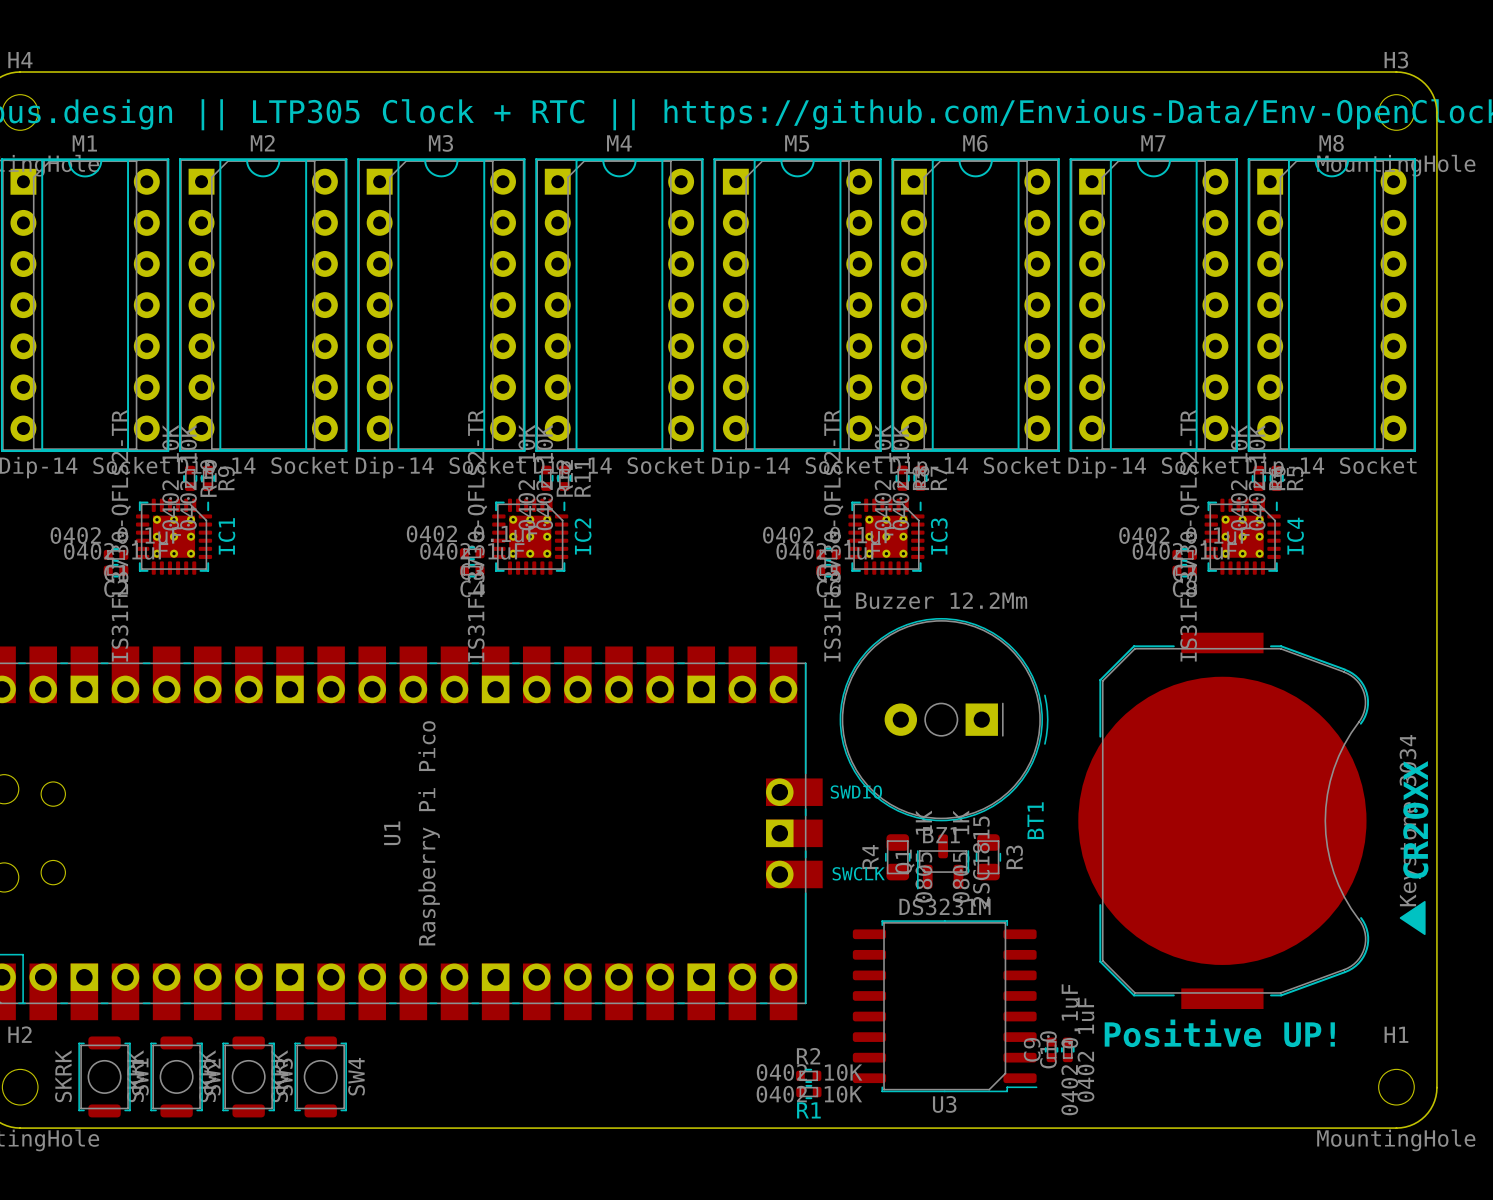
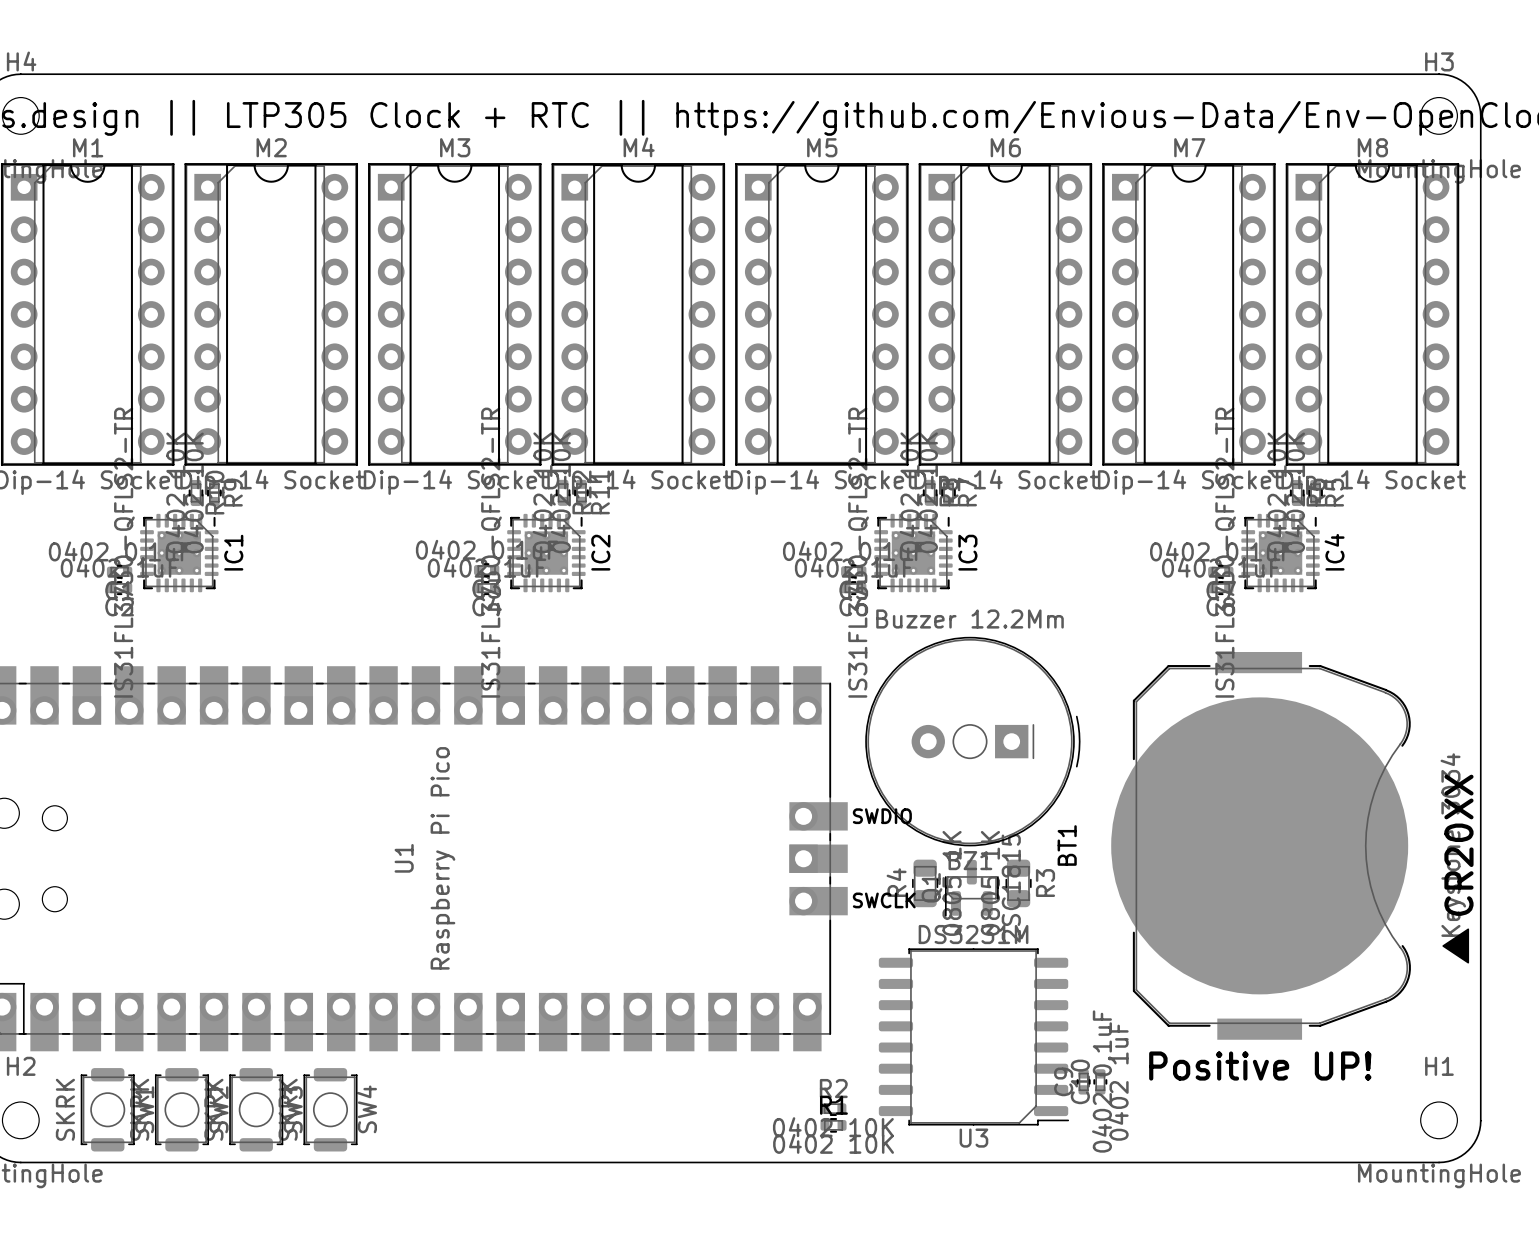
R1 value position: 0402 10K (809, 1072) -> 0402 10K (833, 1143)
R1 name position: R1 (808, 1110) -> R1 (833, 1105)

